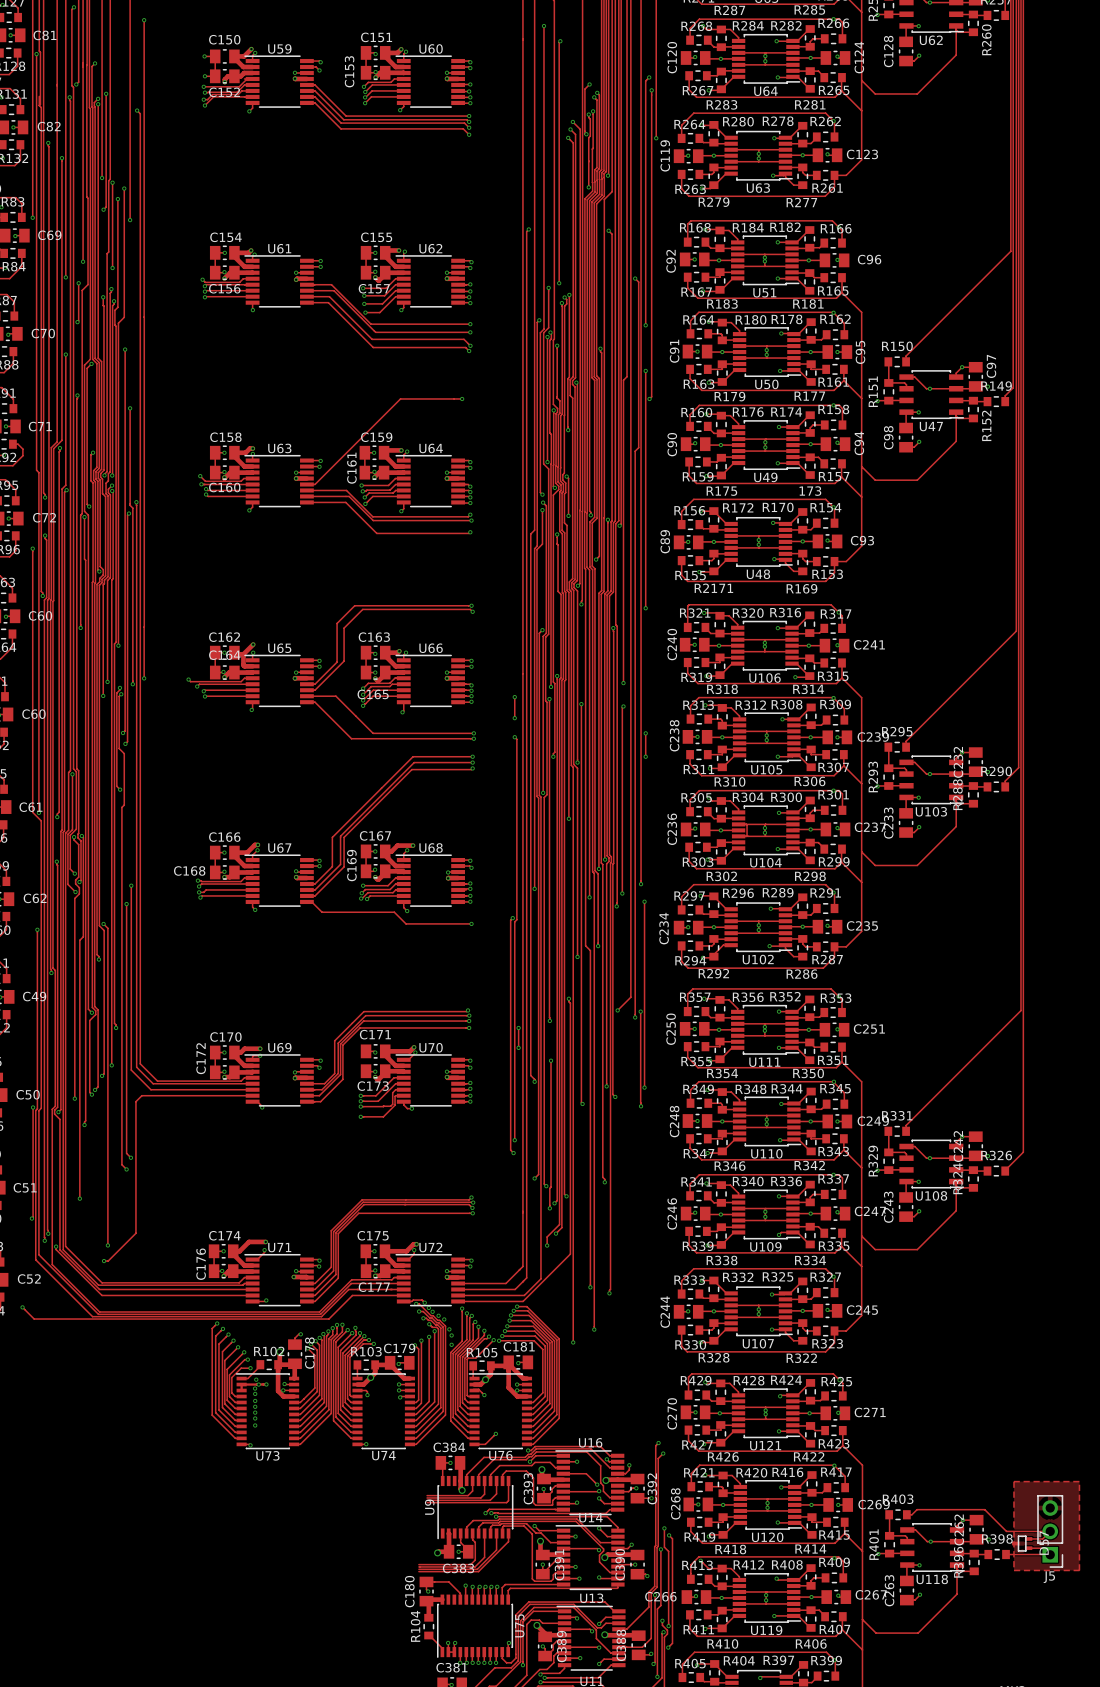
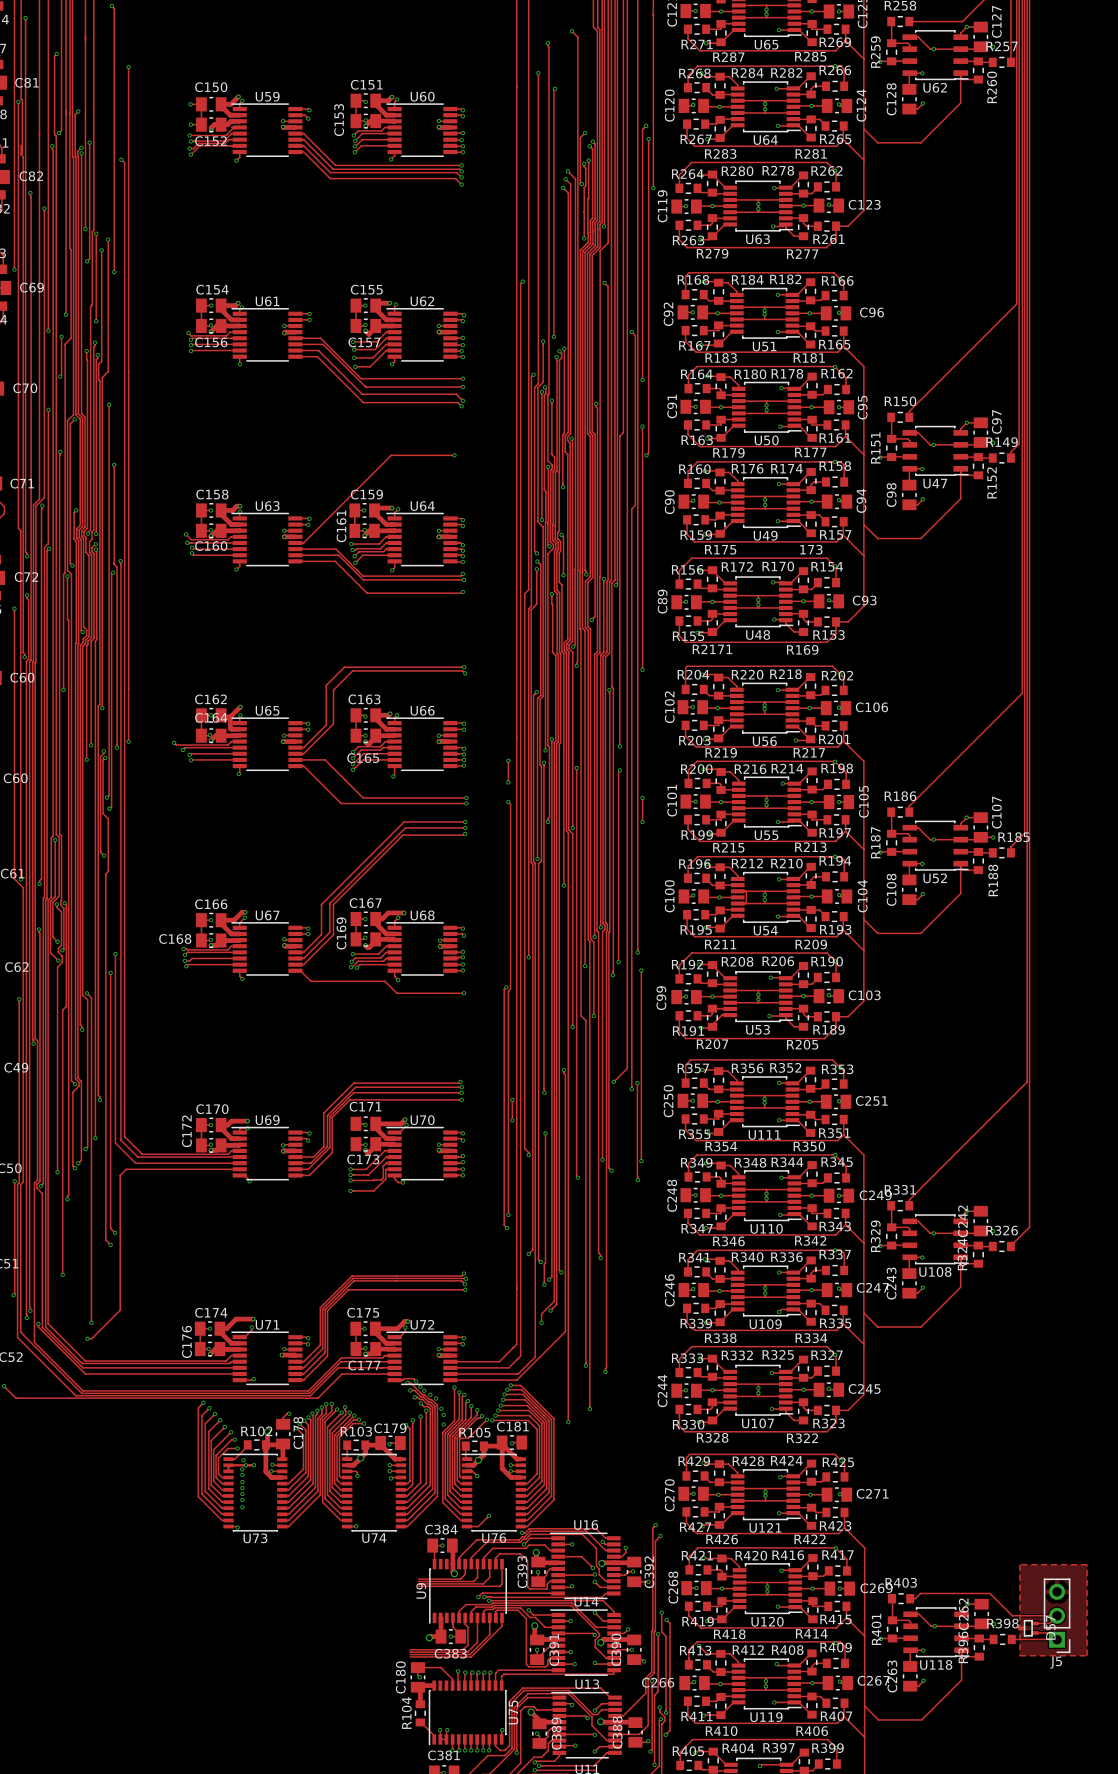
R316 name: R316 (785, 612) -> R218 (785, 674)
R321 name: R321 (695, 613) -> R204 (693, 674)
R320 name: R320 (748, 613) -> R220 (747, 674)
R317 name: R317 (836, 614) -> R202 (837, 675)
C240 name: C240 (672, 644) -> C102 (669, 707)
C241 name: C241 (869, 644) -> C106 (871, 707)
R315 name: R315 (833, 676) -> R201 (834, 739)
R319 name: R319 (696, 677) -> R203 (694, 740)
U106 name: U106 (765, 678) -> U56 (764, 741)
R318 name: R318 (722, 689) -> R219 (721, 752)
R314 name: R314 (808, 689) -> R217 (809, 752)
R308 name: R308 (787, 704) -> R214 (787, 768)
R309 name: R309 (835, 704) -> R198 (837, 768)
R313 name: R313 (698, 705) -> R200 (696, 769)
R312 name: R312 (750, 705) -> R216 (750, 769)
R295 name: R295 (897, 731) -> R186 (900, 796)
C238 name: C238 (674, 735) -> C101 (672, 800)
C239 name: C239 (873, 737) -> C105 (863, 801)
C232 name: C232 (958, 762) -> C107 (996, 812)
R307 name: R307 (833, 767) -> R197 (835, 832)
R311 name: R311 (698, 769) -> R199 (697, 835)
U105 name: U105 (766, 769) -> U55 (766, 835)
R290 name: R290 (996, 771) -> R185 (1014, 837)
R293 name: R293 (873, 776) -> R187 (875, 842)
R310 name: R310 (729, 781) -> R215 (728, 847)
R306 name: R306 (809, 781) -> R213 (810, 847)
R301 name: R301 (833, 794) -> R194 (835, 860)
R288 name: R288 (957, 794) -> R188 (993, 880)
R305 name: R305 (696, 797) -> R196 (694, 864)
R304 name: R304 (748, 797) -> R212 (747, 863)
R300 name: R300 (786, 797) -> R210 (786, 863)
U103 name: U103 (931, 811) -> U52 (935, 878)
C233 name: C233 (888, 823) -> C108 (891, 889)
C237 name: C237 (870, 827) -> C104 (862, 896)
C236 name: C236 (672, 829) -> C100 (669, 896)
R299 name: R299 (834, 861) -> R193 (835, 929)
R303 name: R303 (698, 862) -> R195 (696, 929)
U104 name: U104 (765, 862) -> U54 (765, 930)
R302 name: R302 (721, 876) -> R211 (720, 944)
R298 name: R298 (810, 876) -> R209 (811, 944)
R289 name: R289 (778, 892) -> R206 (778, 961)
R291 name: R291 (825, 892) -> R190 (827, 961)
R296 name: R296 (738, 893) -> R208 (737, 961)
R297 name: R297 (689, 896) -> R192 (687, 964)
C235 name: C235 (862, 925) -> C103 (864, 995)
C234 name: C234 (664, 928) -> C99 (661, 998)
U102 name: U102 (758, 959) -> U53 (758, 1029)
R287 name: R287 (827, 959) -> R189 (829, 1029)
R294 name: R294 (690, 960) -> R191 (688, 1031)
R292 name: R292 (713, 973) -> R207 (712, 1044)
R286 name: R286 (802, 974) -> R205 (802, 1044)

